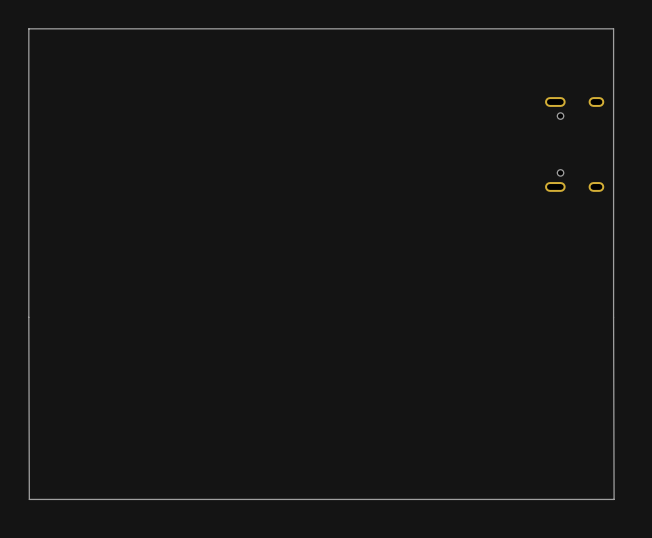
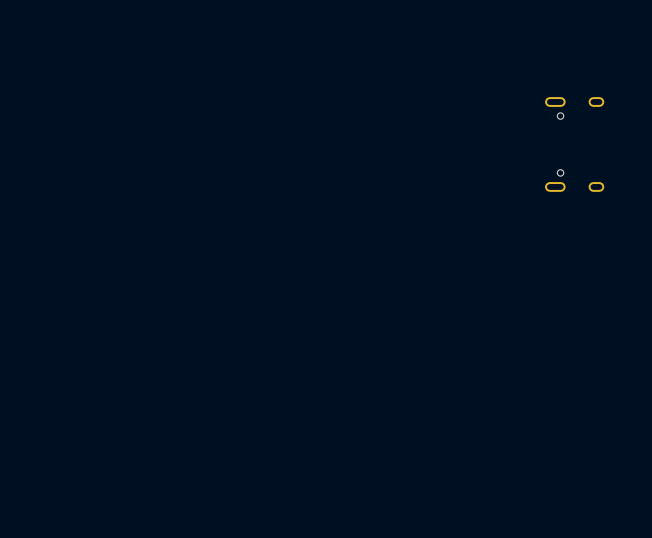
board edge: (613, 28) (28, 28) (29, 499) (614, 499) (613, 28) -> none

